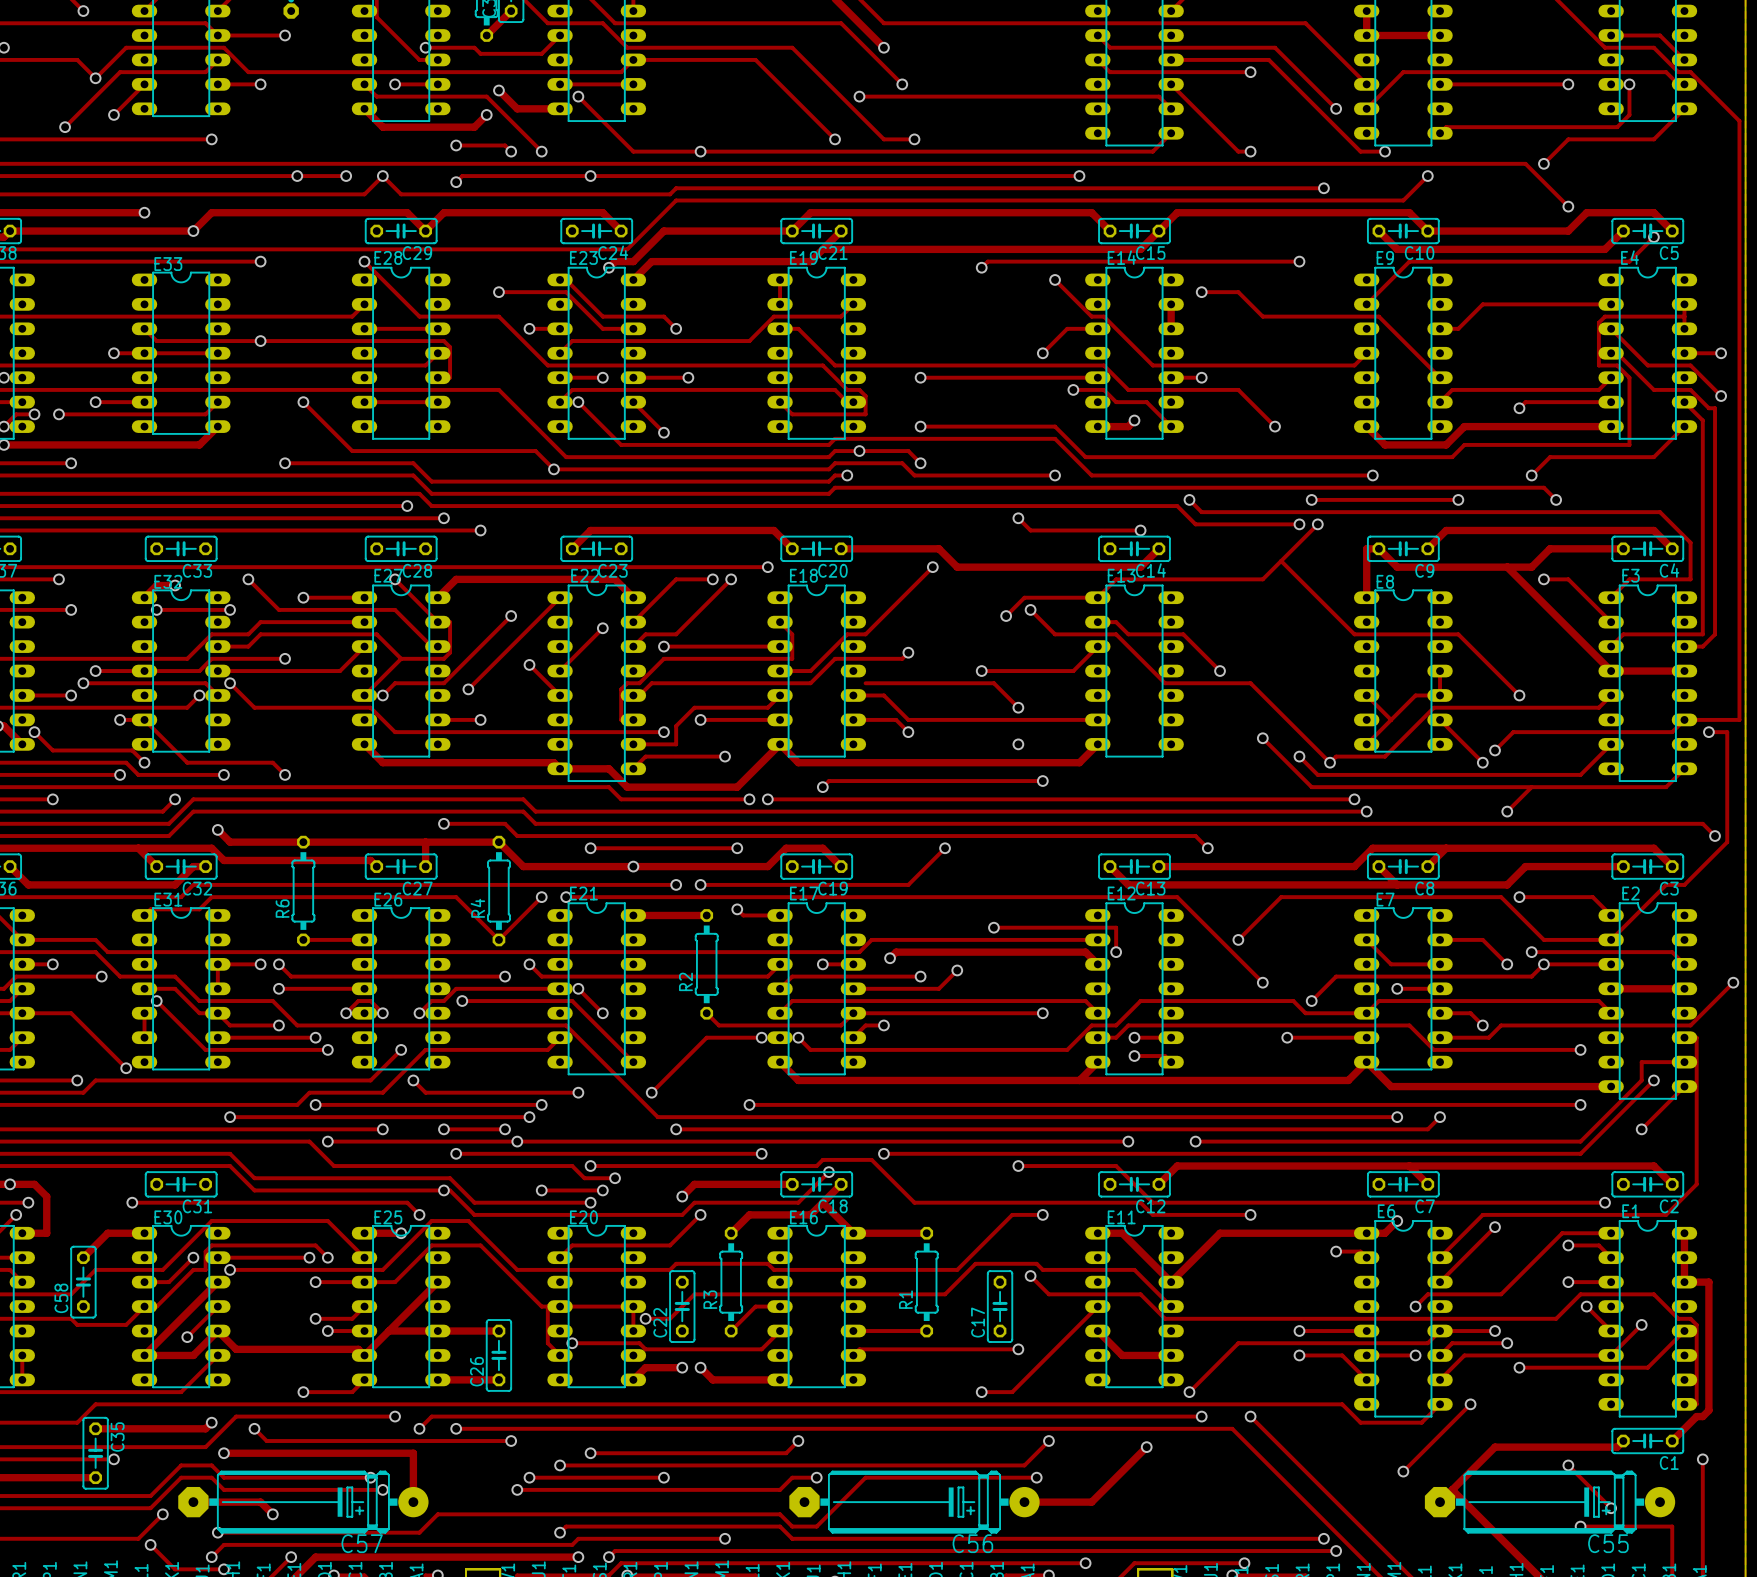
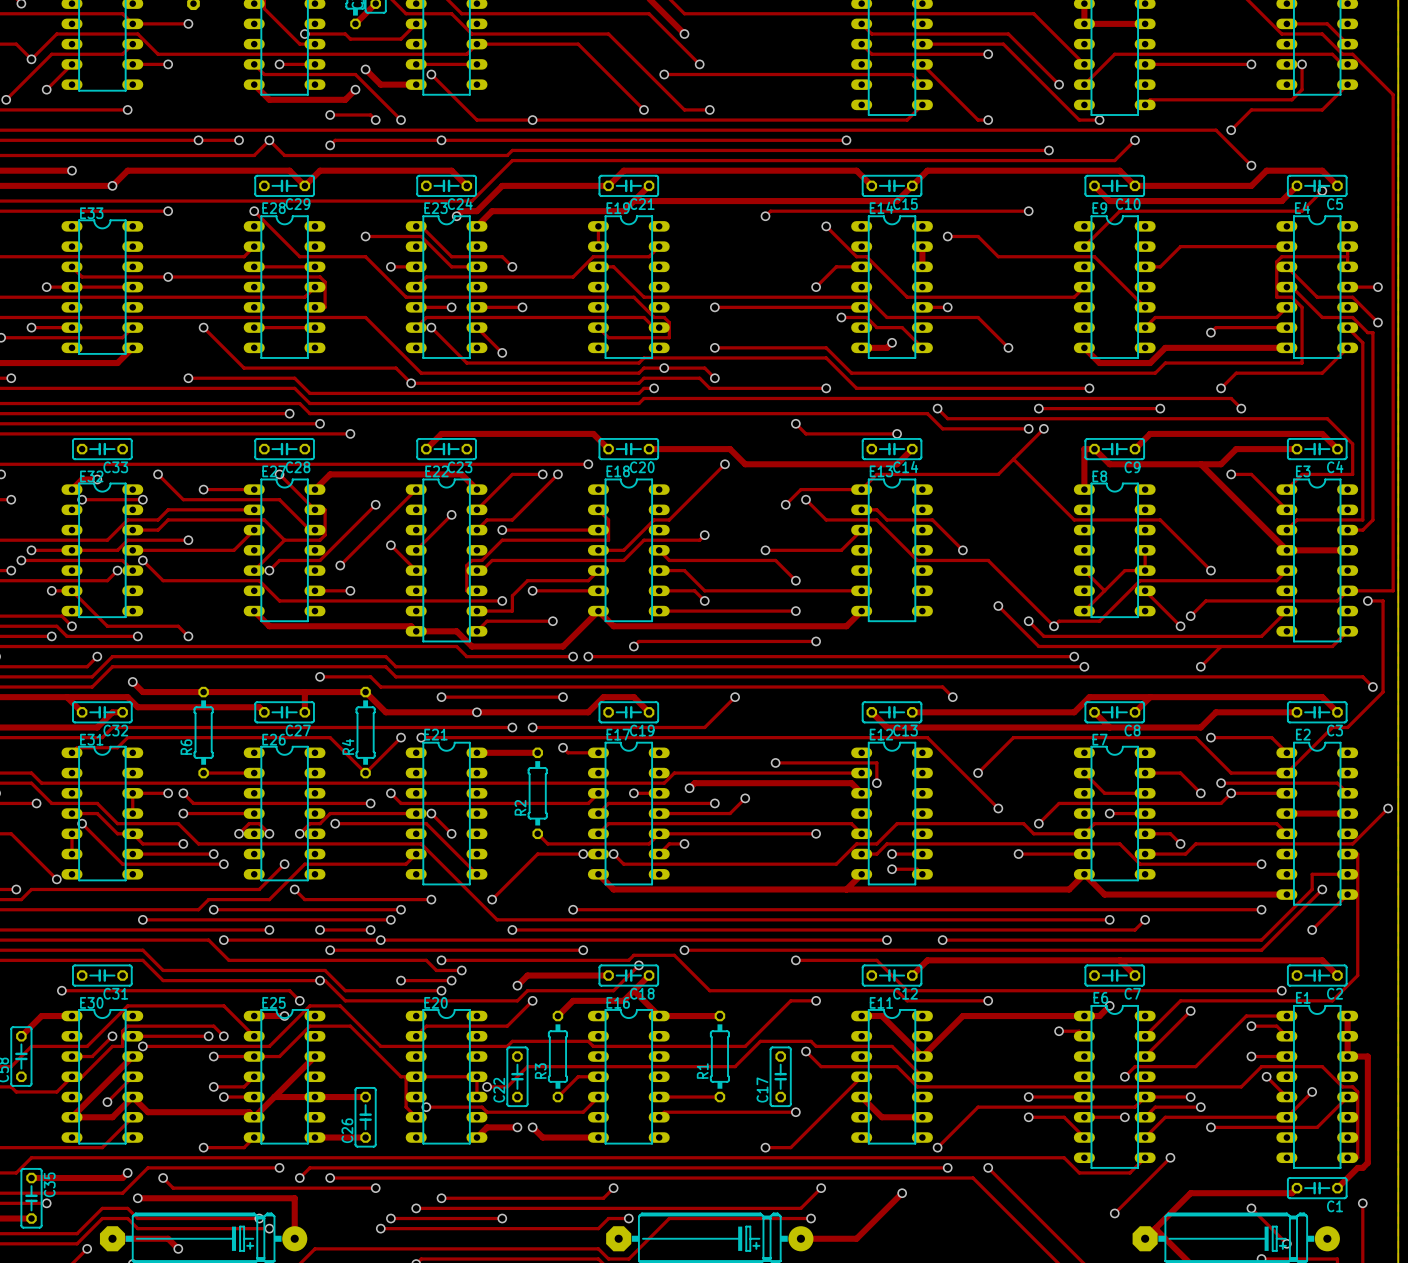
track: none -> (659, 550) (669, 560)
track: none -> (659, 611) (795, 611)

